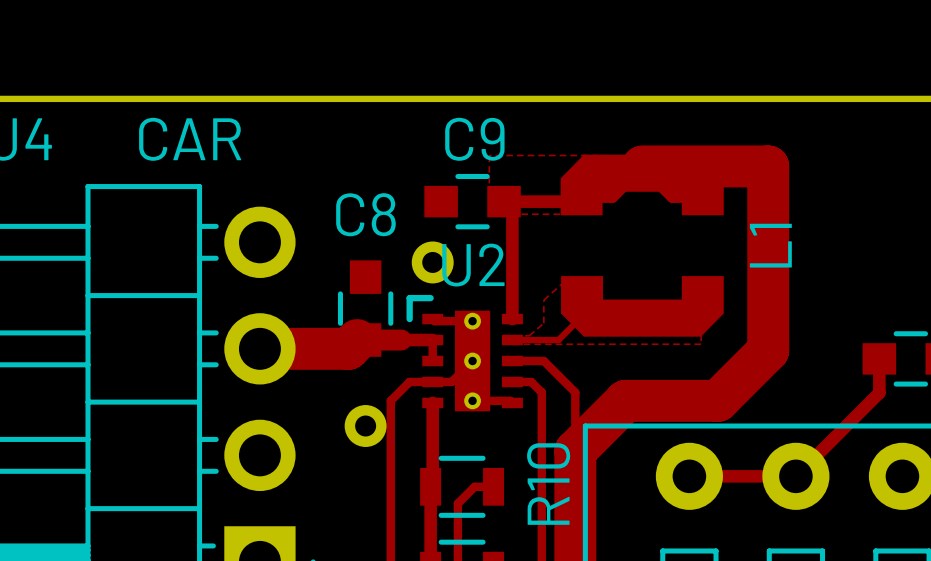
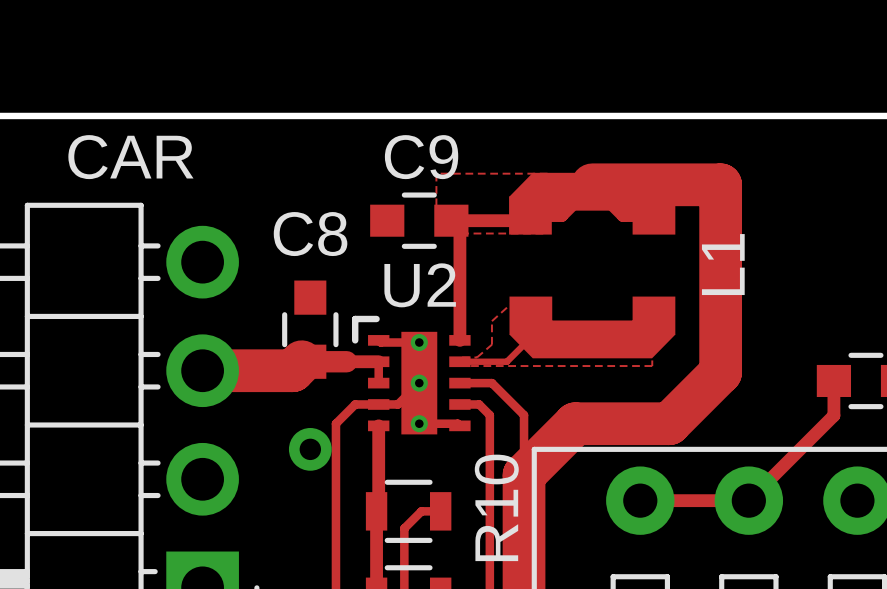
part: (432, 262) -> none

